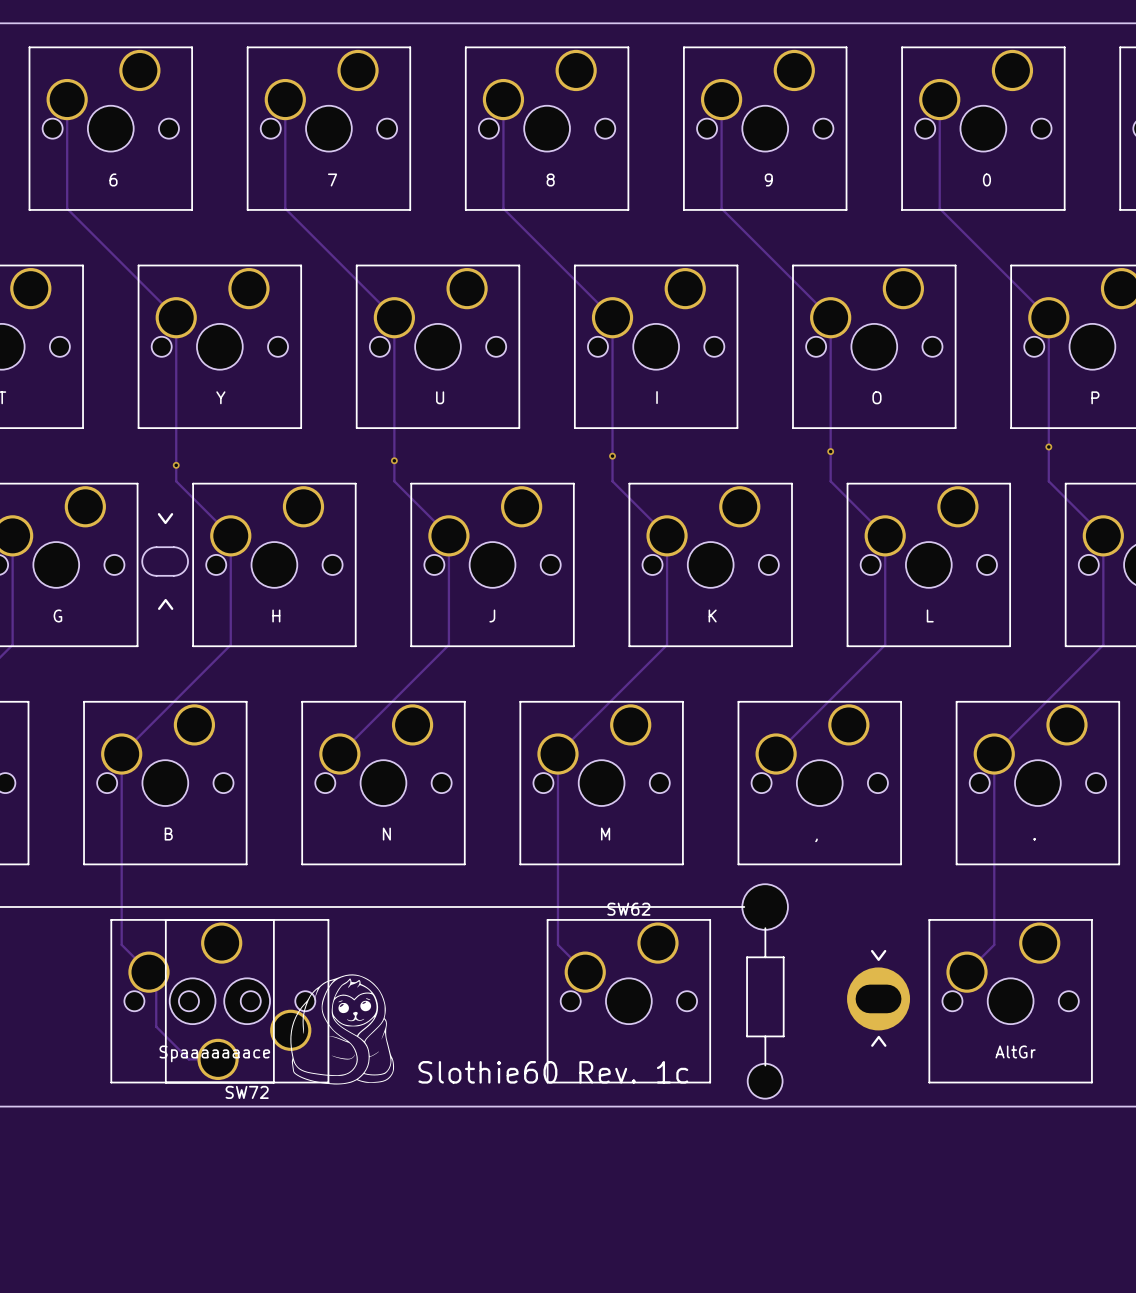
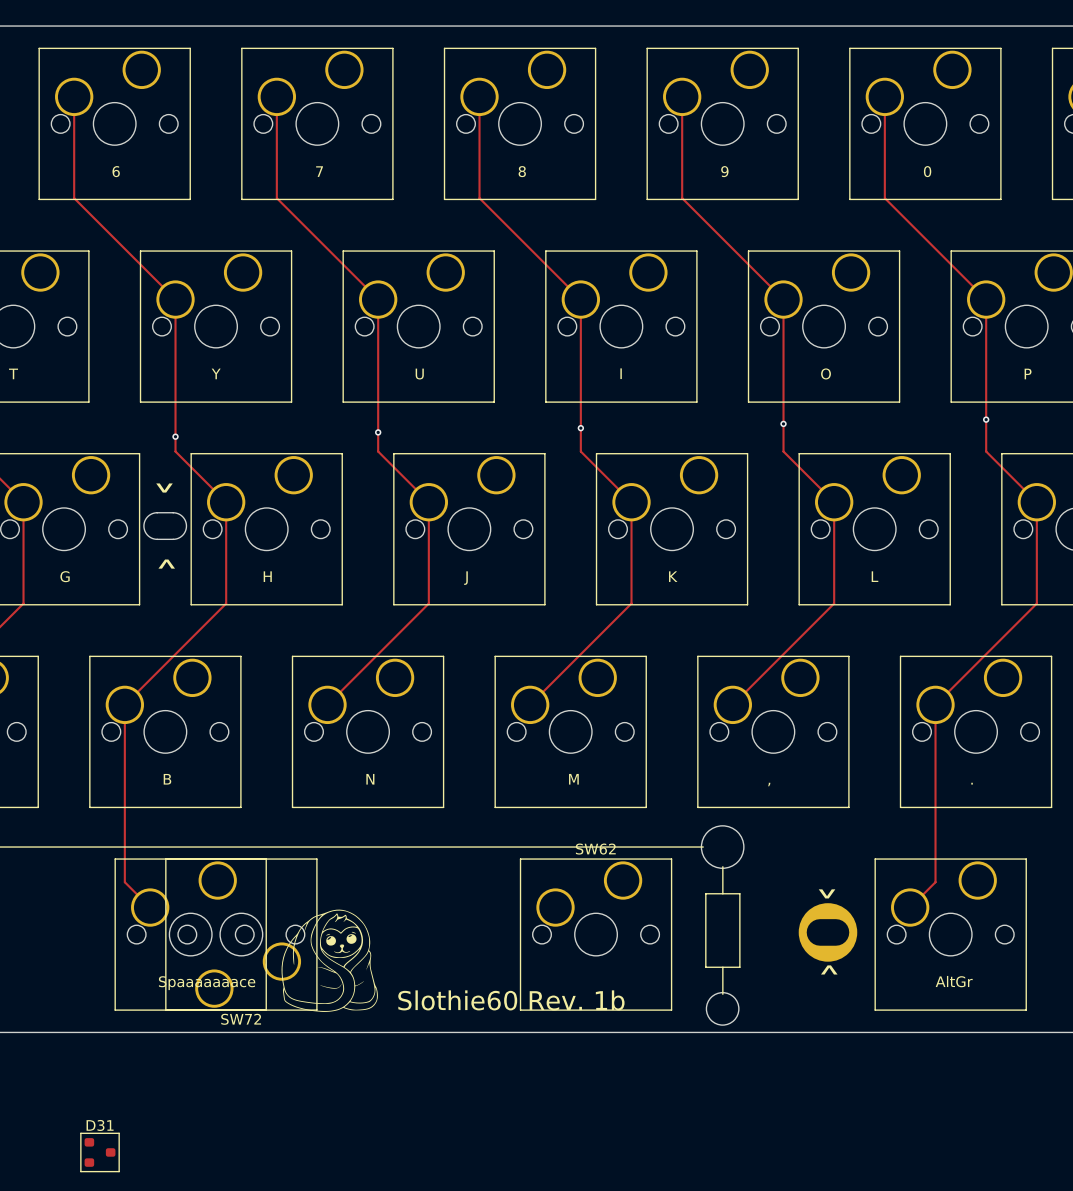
track: (557, 754) (557, 944) (585, 972) -> none
track: (148, 972) (156, 979) (156, 1026) (188, 1059) (218, 1059) -> none
text: Slothie60 Rev. 1c (553, 1072) -> Slothie60 Rev. 1b (511, 1000)
D31: none -> (100, 1152)

